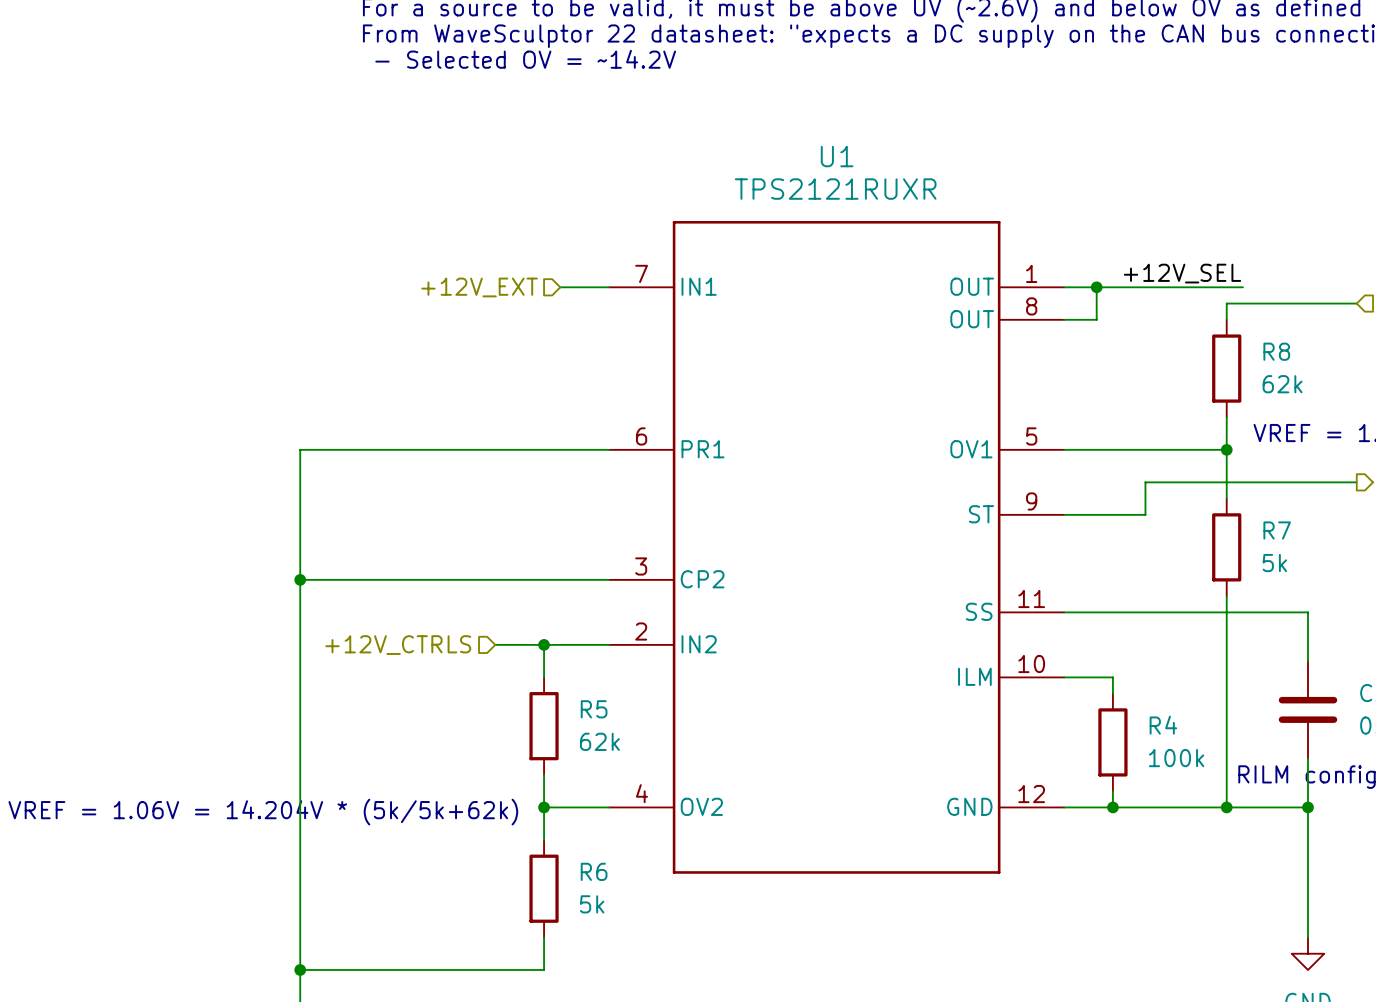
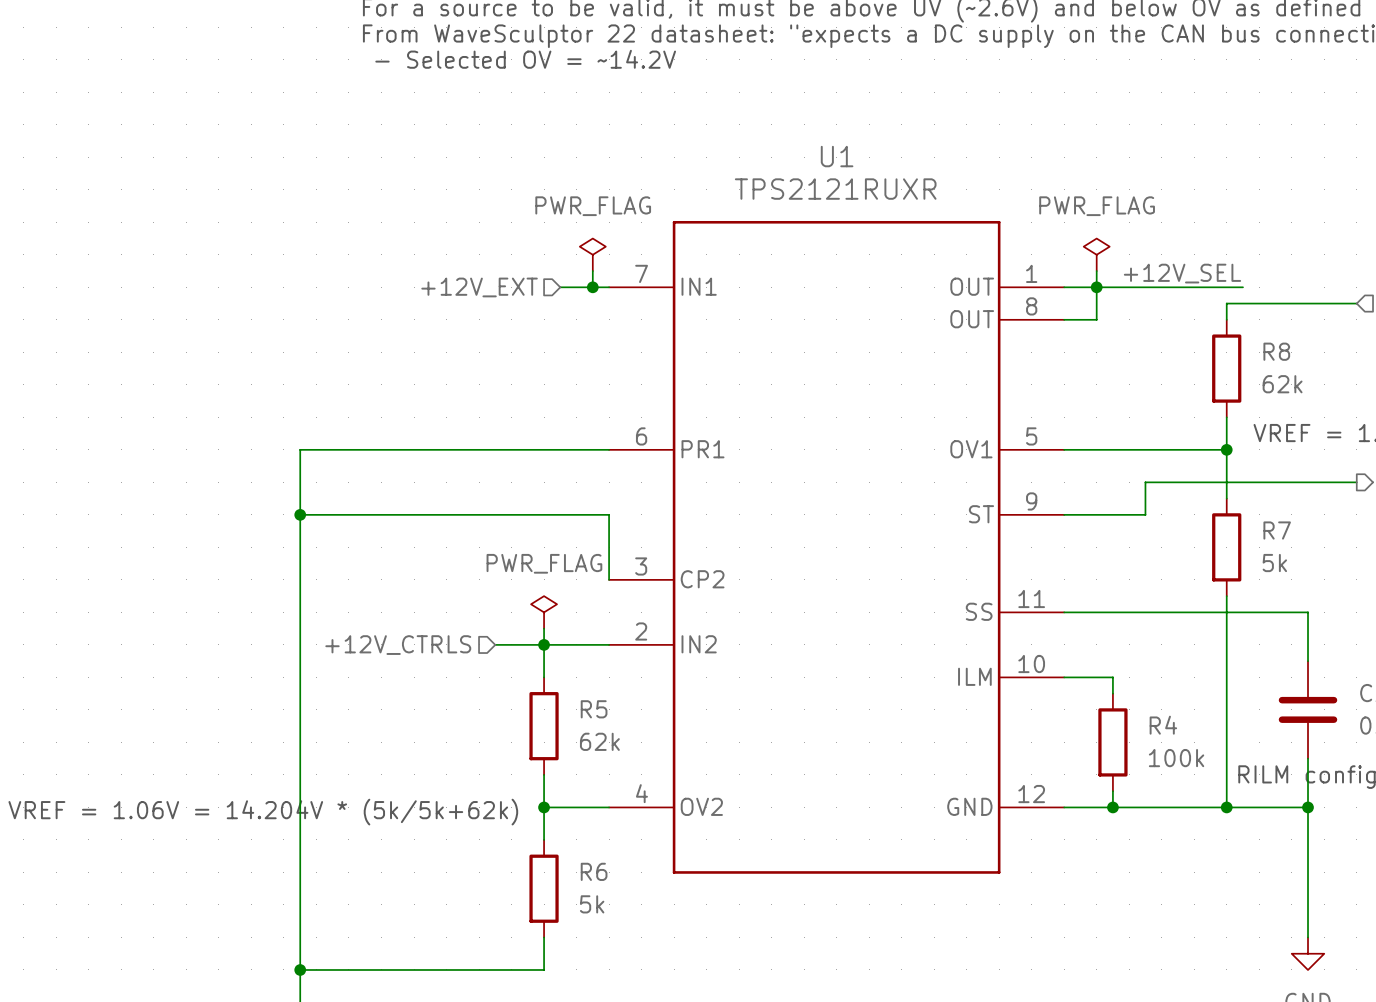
power symbol: none -> PWR_FLAG (592, 254)
power symbol: none -> PWR_FLAG (1096, 254)
wire: none -> (592, 271) (592, 287)
wire: none -> (1096, 271) (1096, 287)
junction: none -> (592, 287)
wire: (300, 579) (609, 579) -> (300, 514) (609, 514) (609, 579)
junction position: (300, 579) -> (300, 514)
power symbol: none -> PWR_FLAG (544, 612)
wire: none -> (544, 628) (544, 644)

